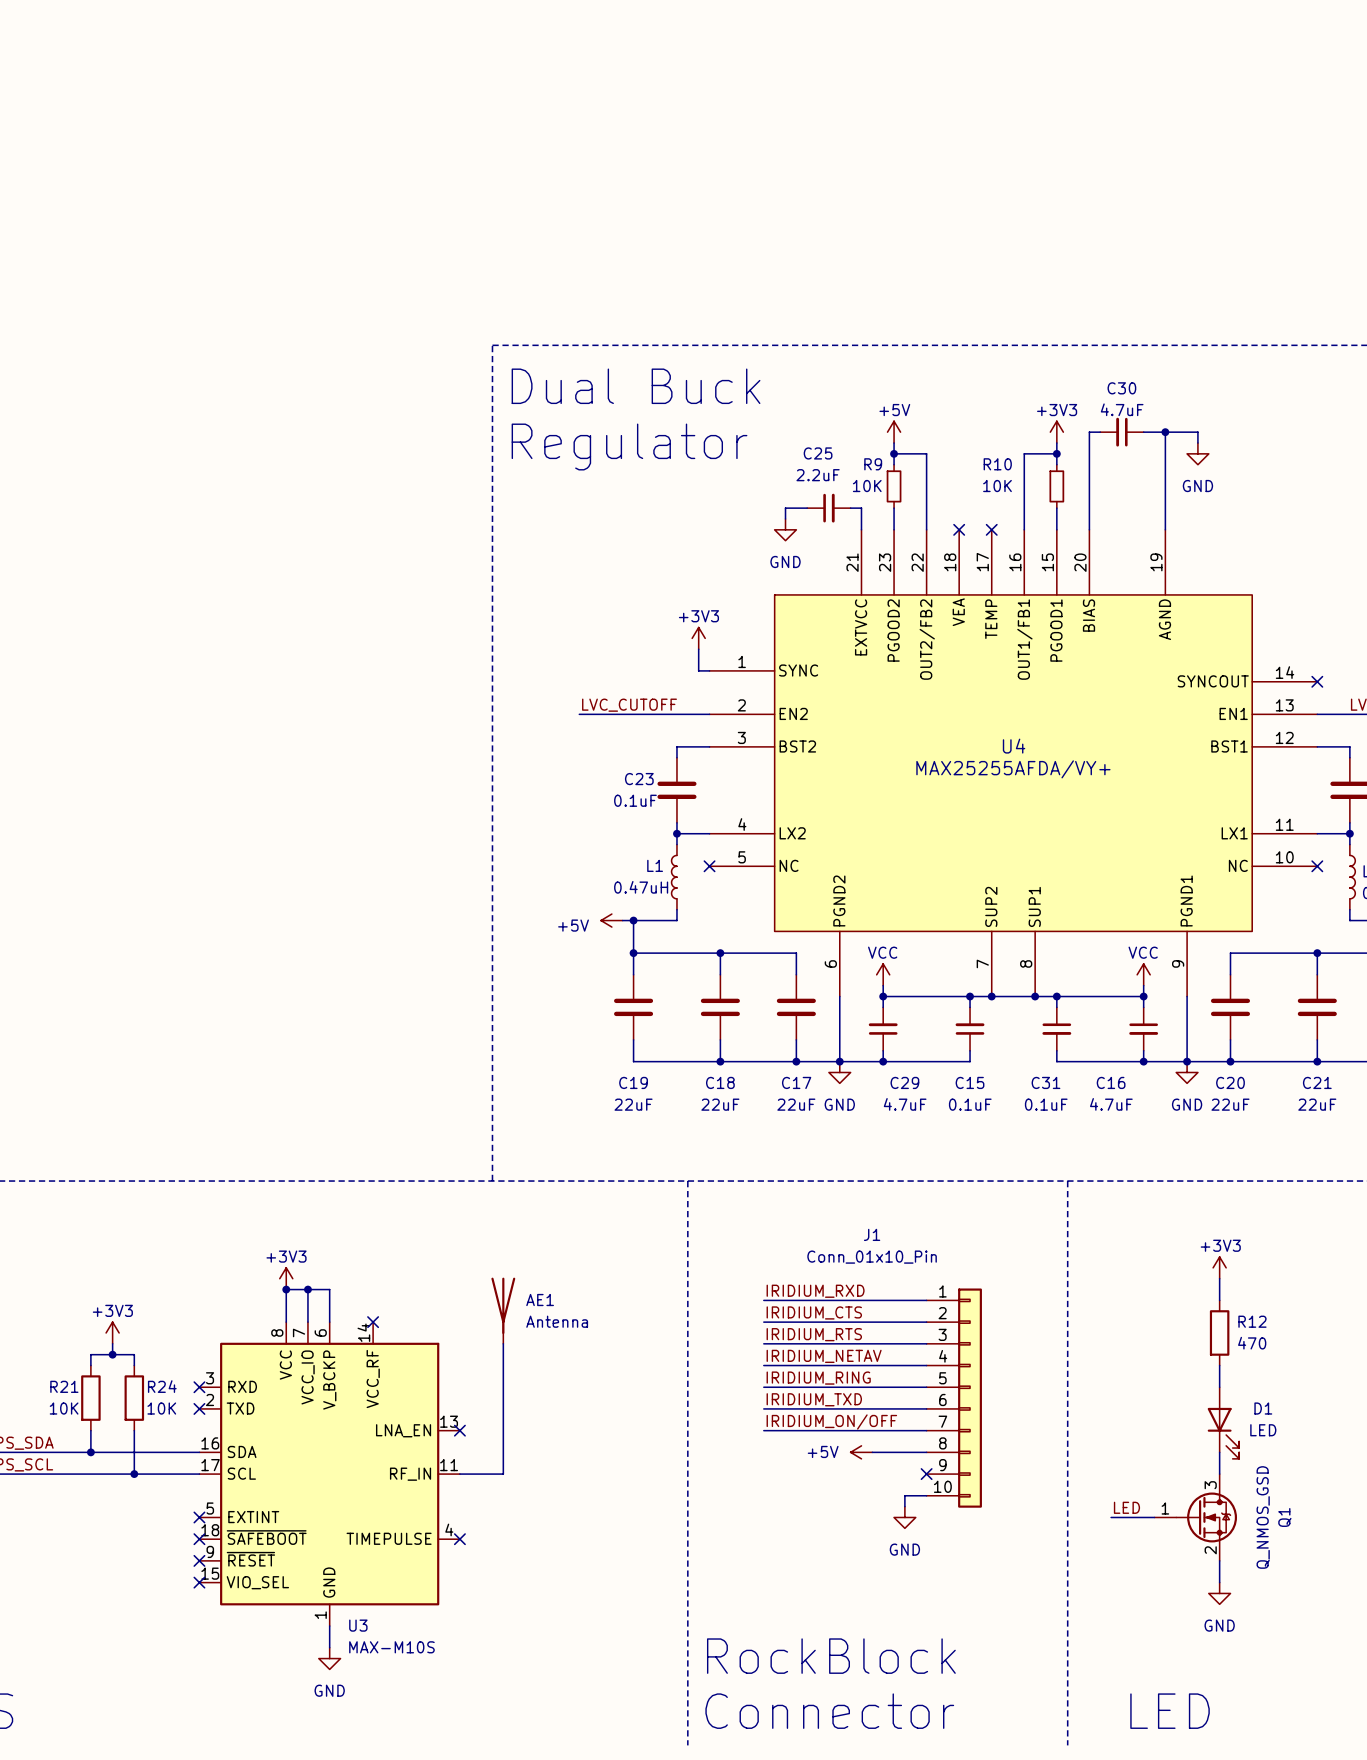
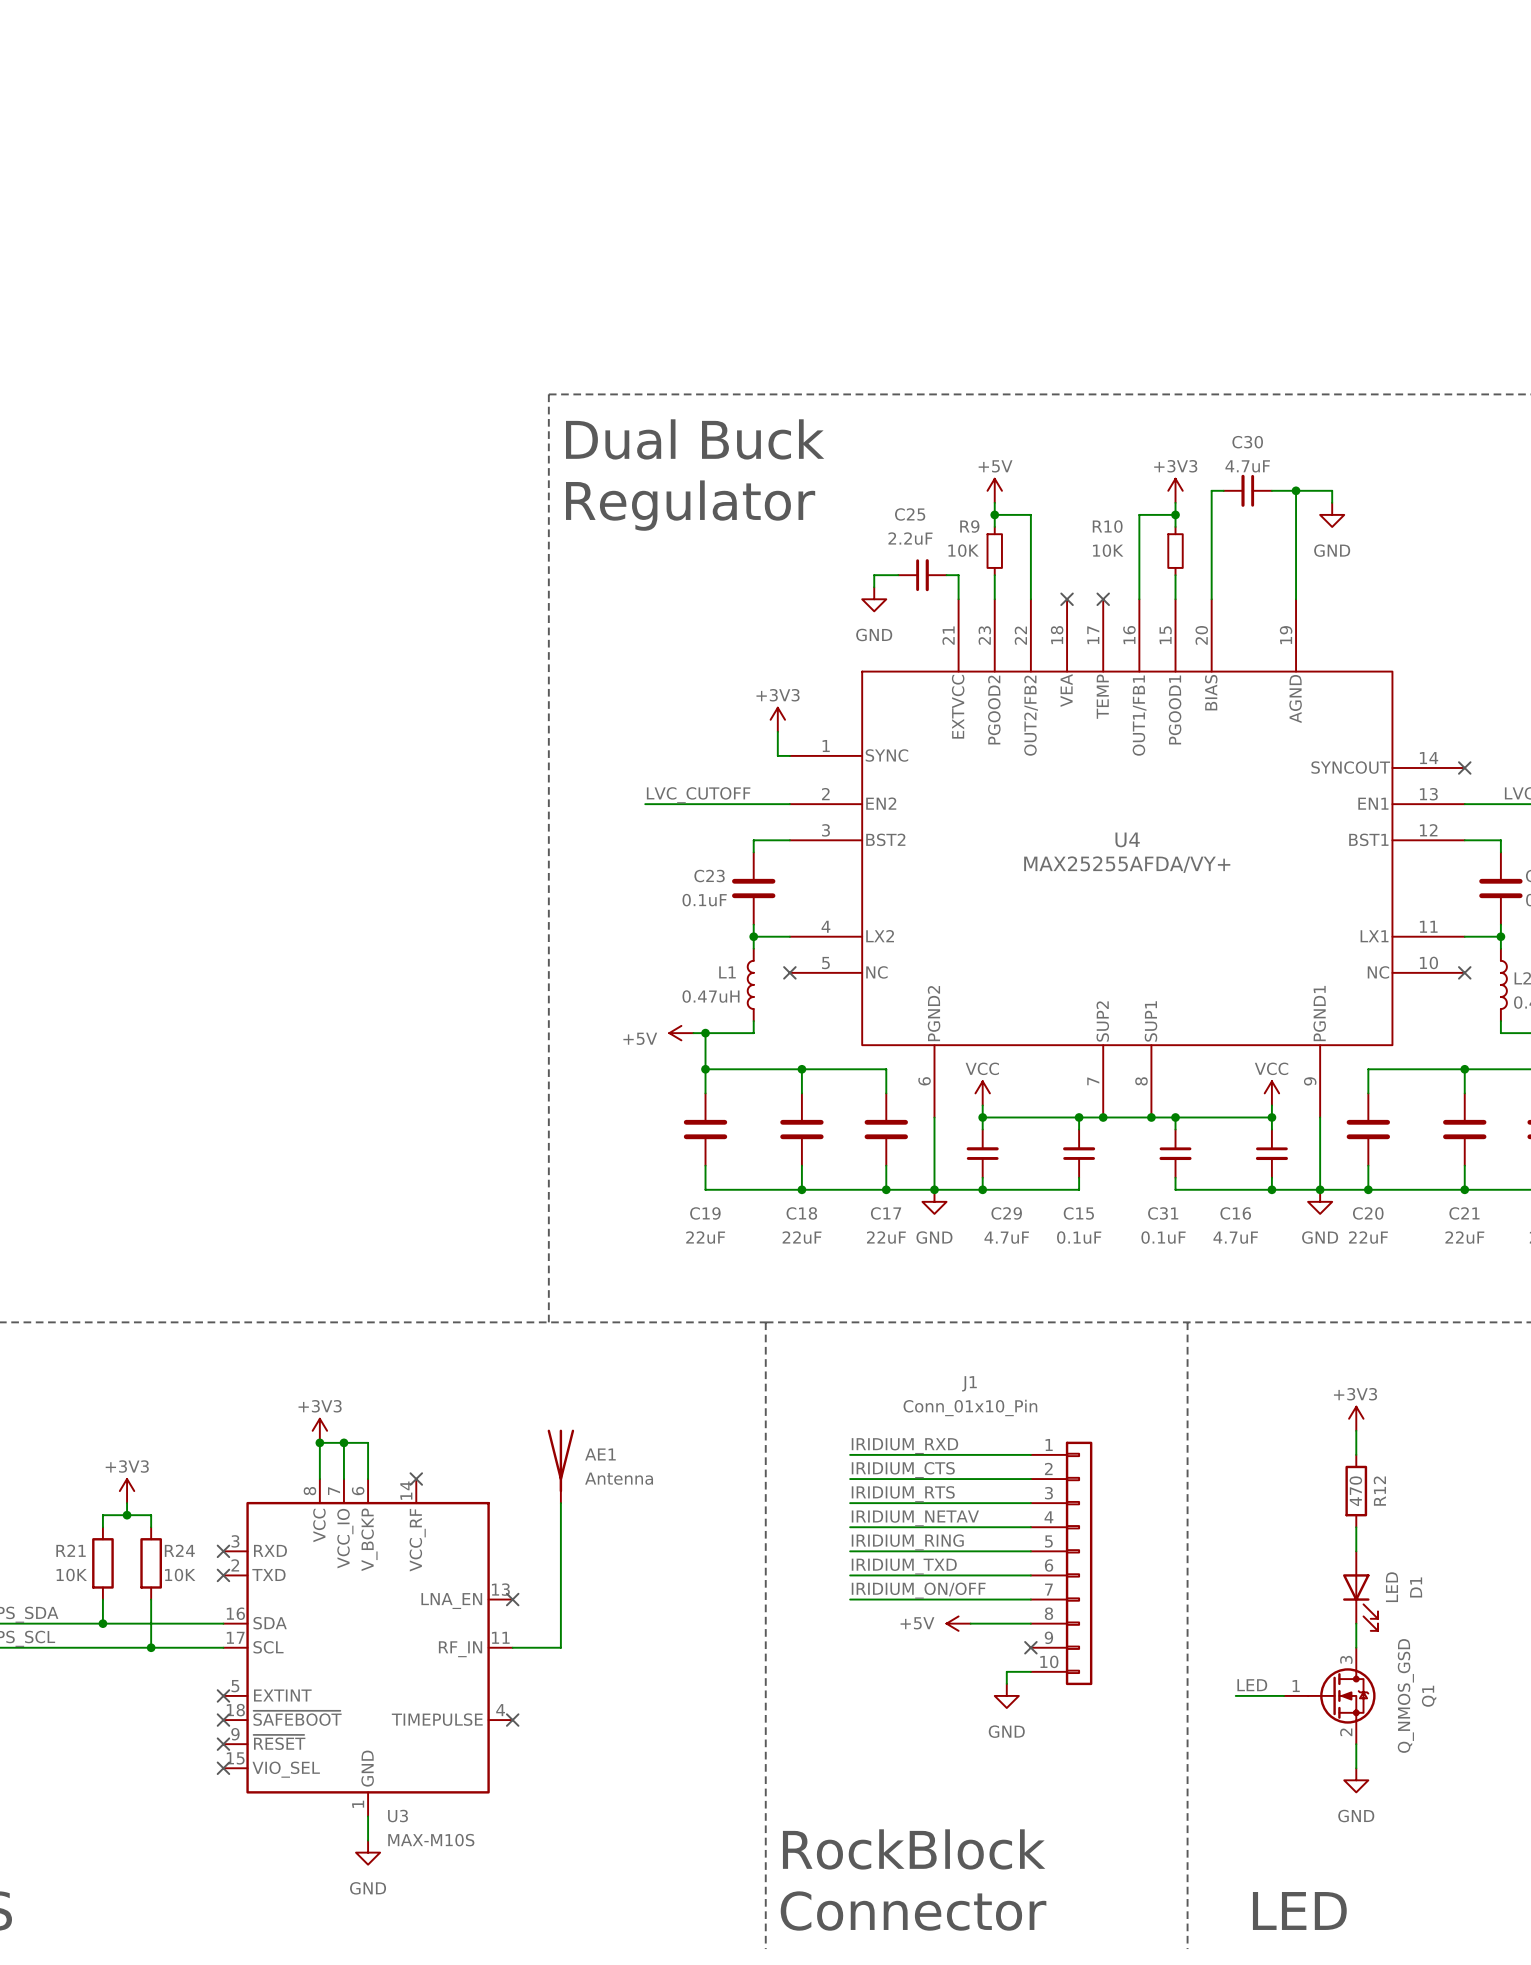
R12 name rotation: 0° (1252, 1321) -> 90° counterclockwise (1379, 1491)
R12 value rotation: 0° (1252, 1343) -> 90° counterclockwise (1355, 1491)
D1 name rotation: 0° (1263, 1408) -> 90° counterclockwise (1416, 1587)
D1 value rotation: 0° (1263, 1430) -> 90° counterclockwise (1391, 1587)

